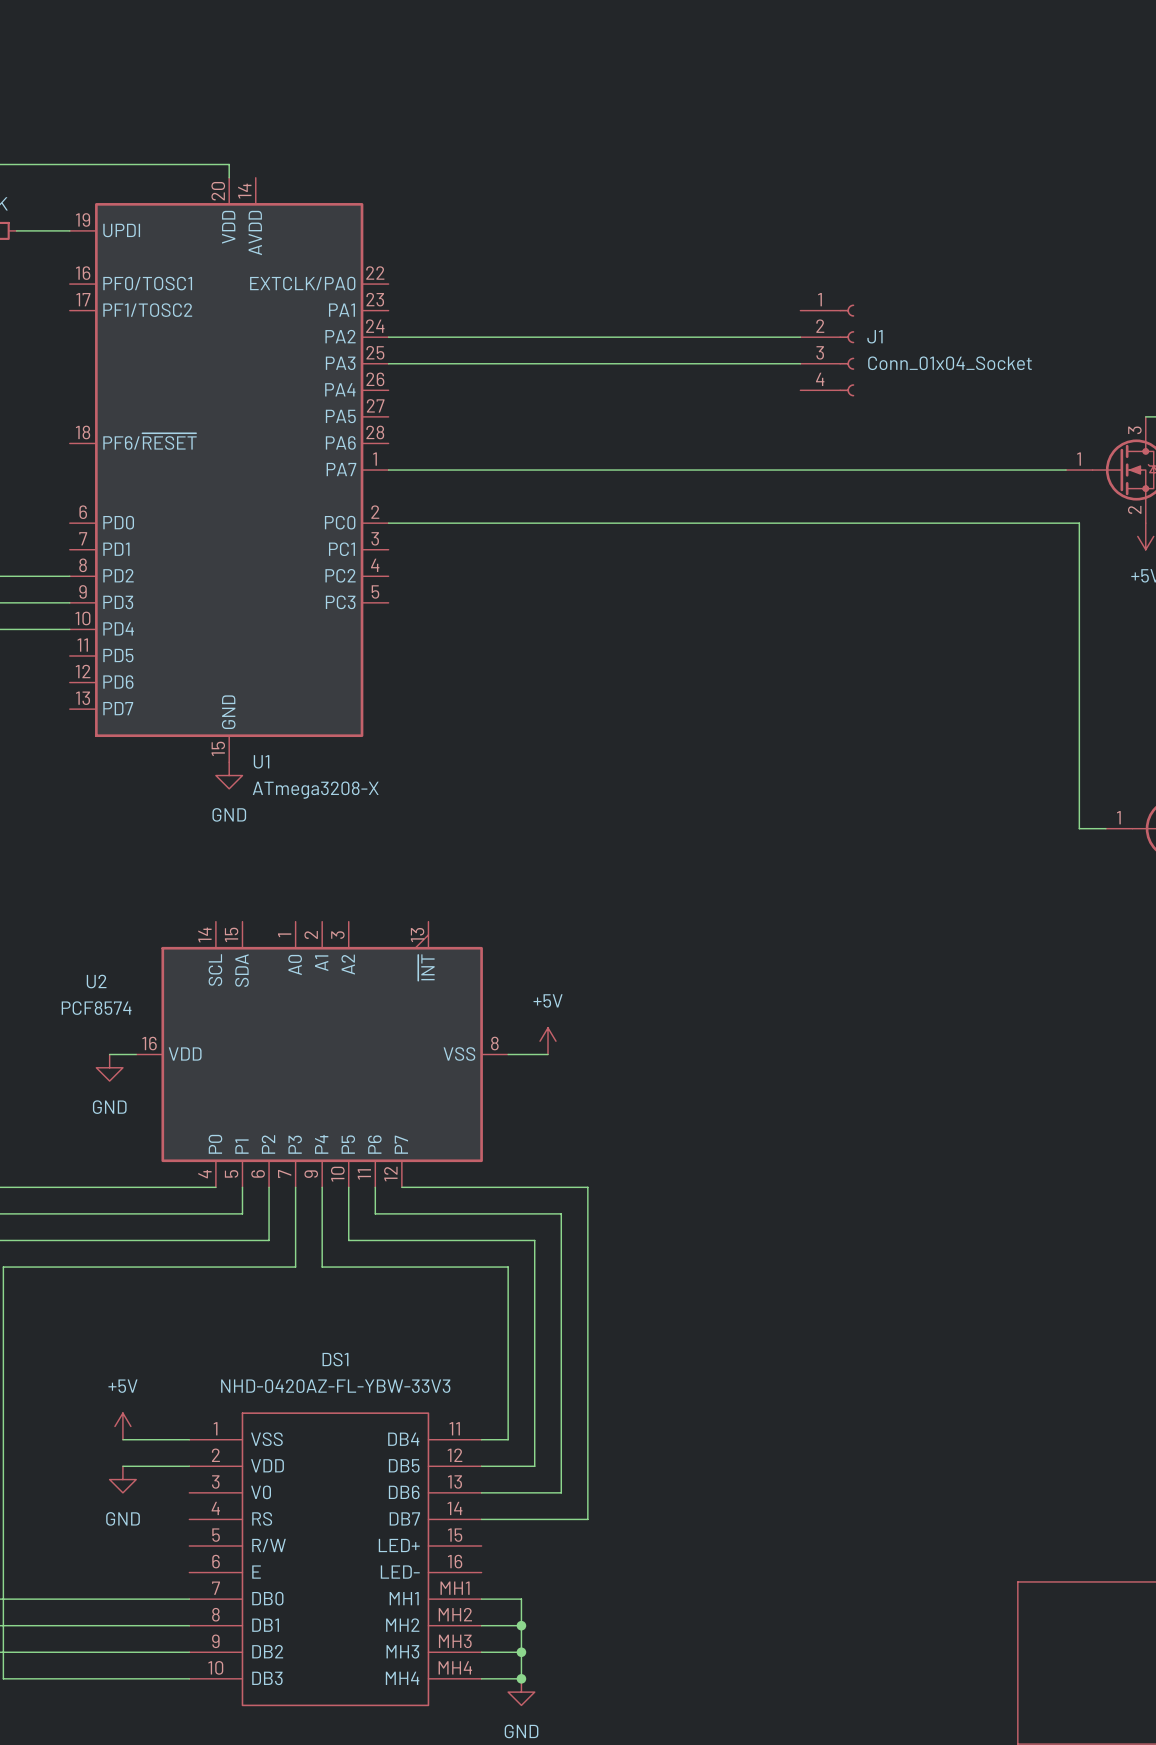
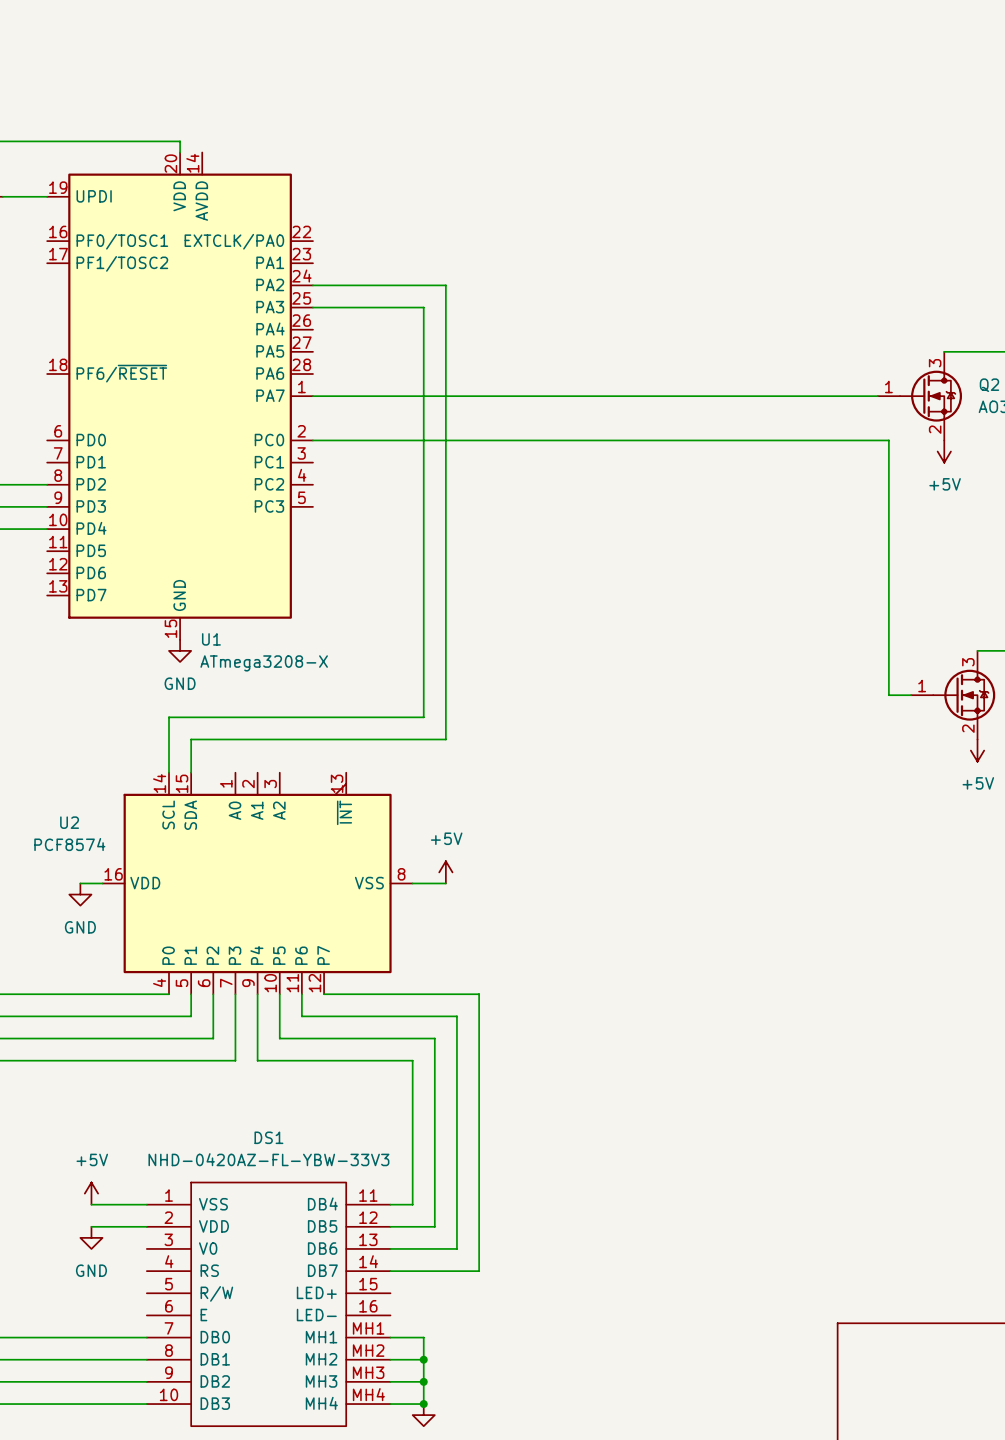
wire: (548, 337) (800, 337) -> (445, 285) (445, 739) (191, 739) (191, 772)
J1: Conn_01x04_Socket (827, 350) -> none
wire: (521, 363) (800, 363) -> (423, 307) (423, 717) (169, 717) (169, 772)

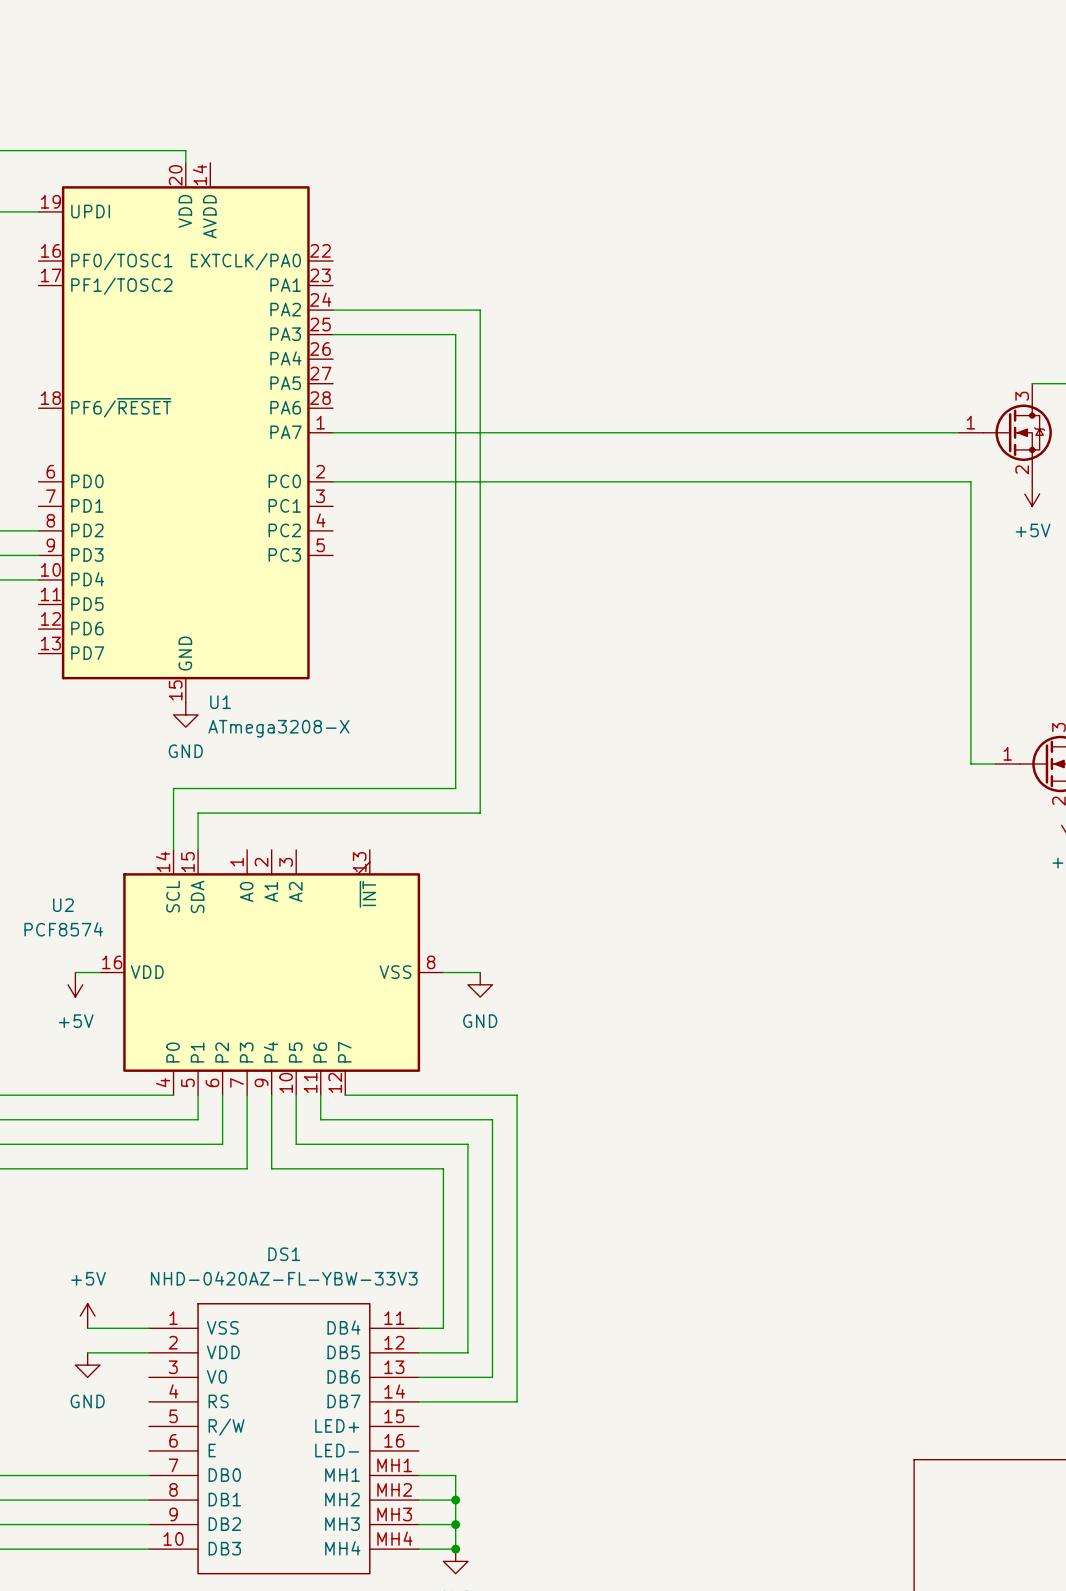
power symbol: +5V (445, 872) -> none
power symbol: GND (80, 894) -> +5V (75, 984)
power symbol: none -> GND (480, 984)

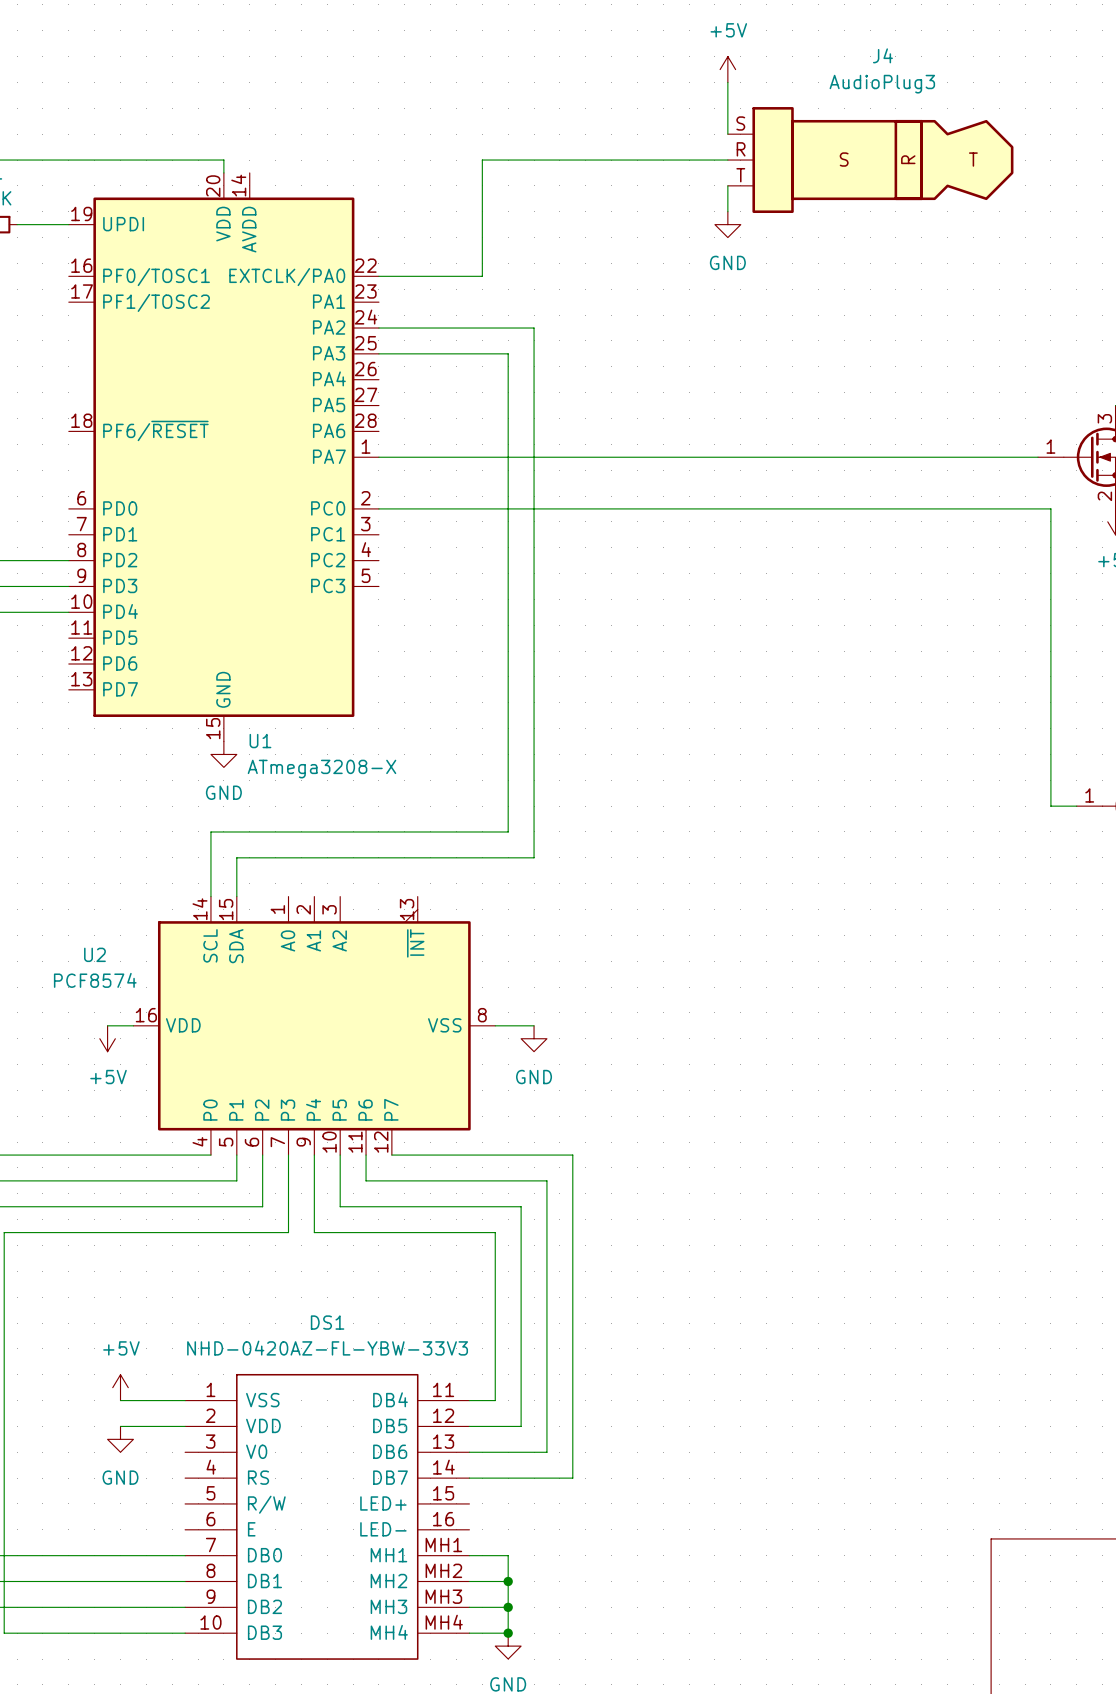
power symbol: none -> +5V (727, 69)
wire: none -> (727, 82) (727, 134)
wire: none -> (727, 160) (482, 160) (482, 276) (378, 276)
J4: none -> AudioPlug3 (870, 160)
wire: none -> (727, 185) (727, 211)
power symbol: none -> GND (727, 224)

